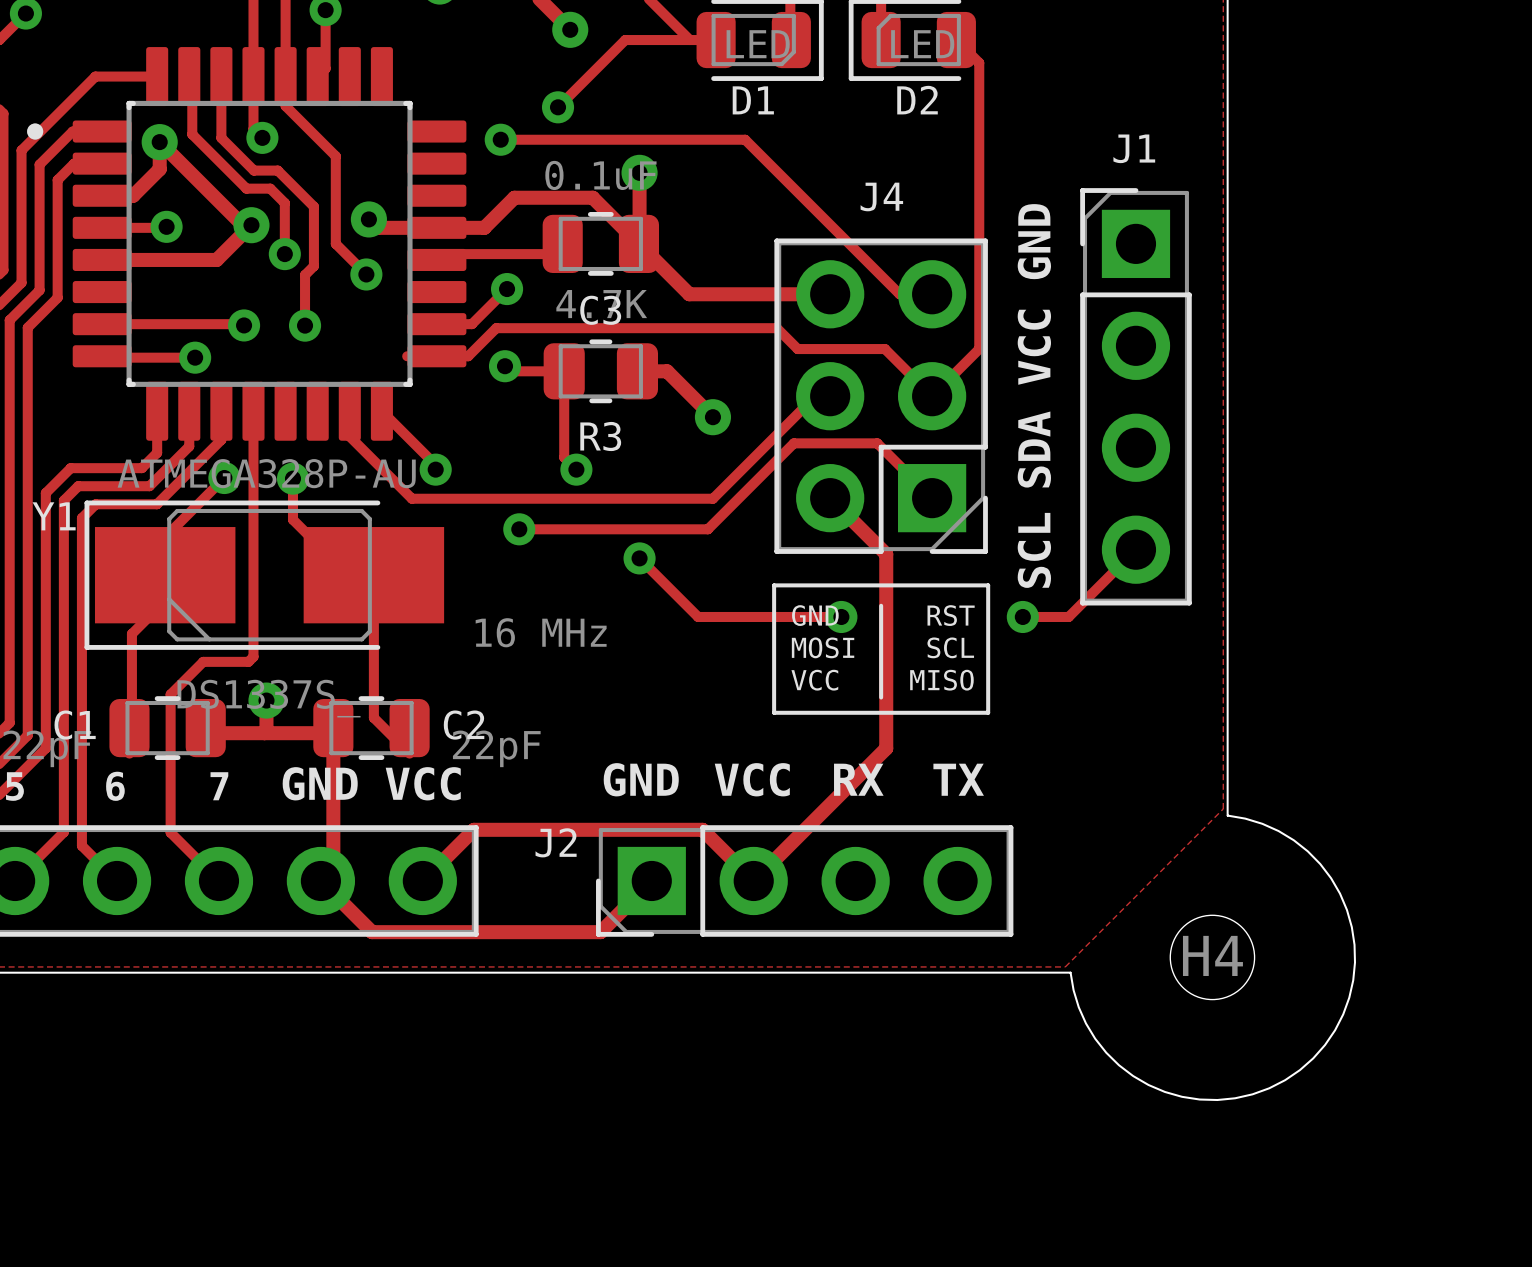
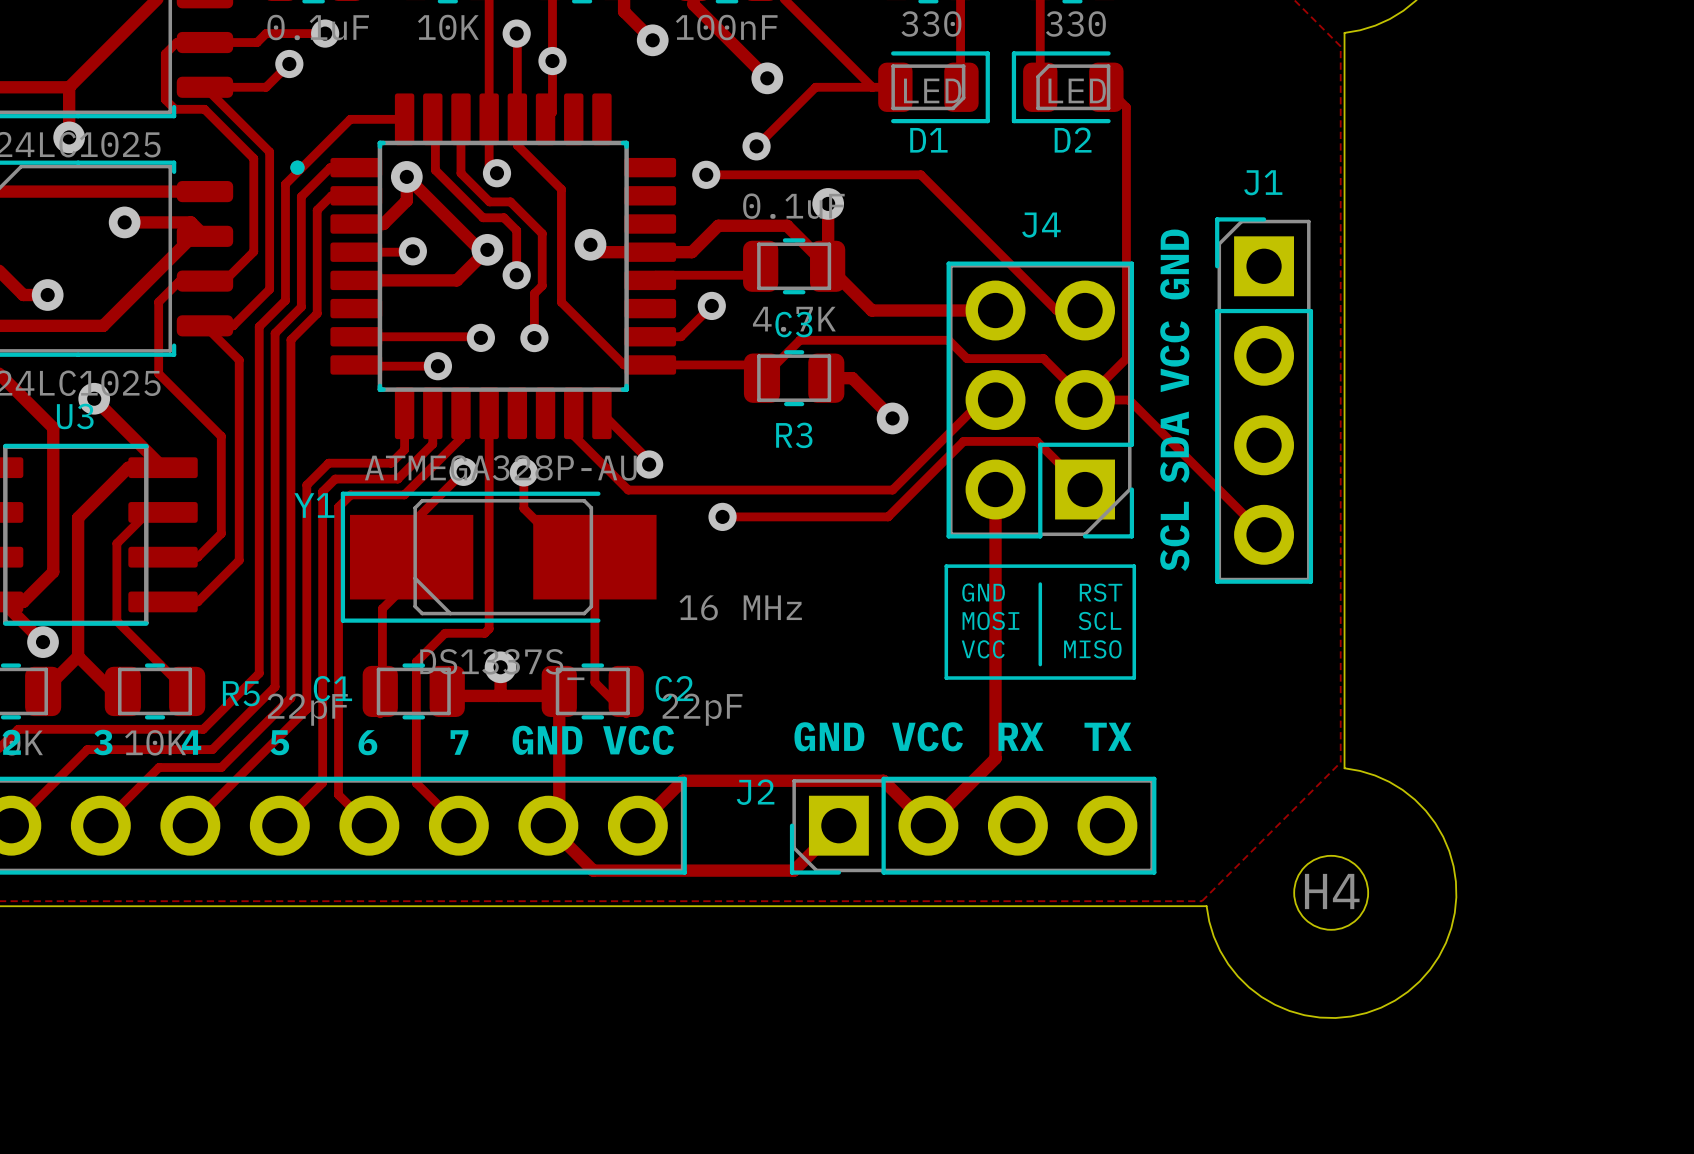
track: (335, 243) (366, 274) -> (561, 266) (561, 302) (624, 364)
via: (366, 274) -> none
track: (607, 328) (496, 328) (468, 356) -> (799, 340) (761, 378) (748, 364) (677, 364)
track: (505, 366) (510, 371) (564, 371) (564, 457) (576, 469) -> none
via: (505, 366) -> none
via: (576, 469) -> none
track: (830, 498) (886, 554) (886, 748) (830, 804) -> (995, 489) (995, 758)
track: (1135, 549) (1068, 616) (1022, 616) -> (1264, 534) (1129, 400) (1085, 400)
track: (639, 558) (698, 616) (841, 616) -> none
via: (639, 558) -> none
via: (841, 616) -> none
via: (1022, 616) -> none

